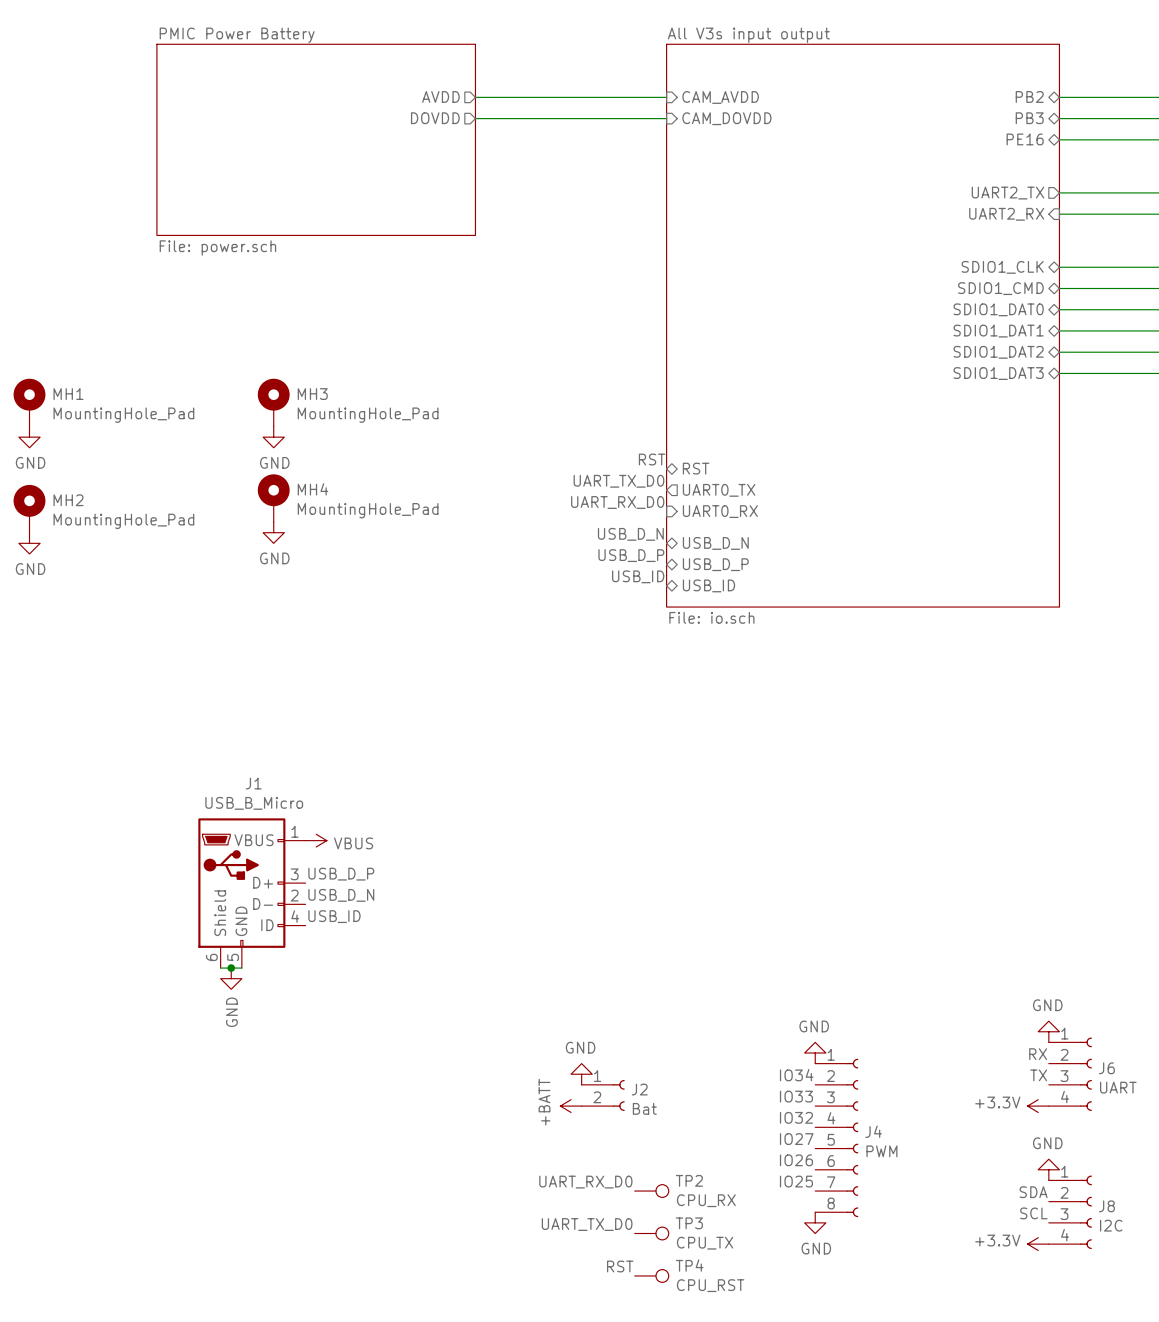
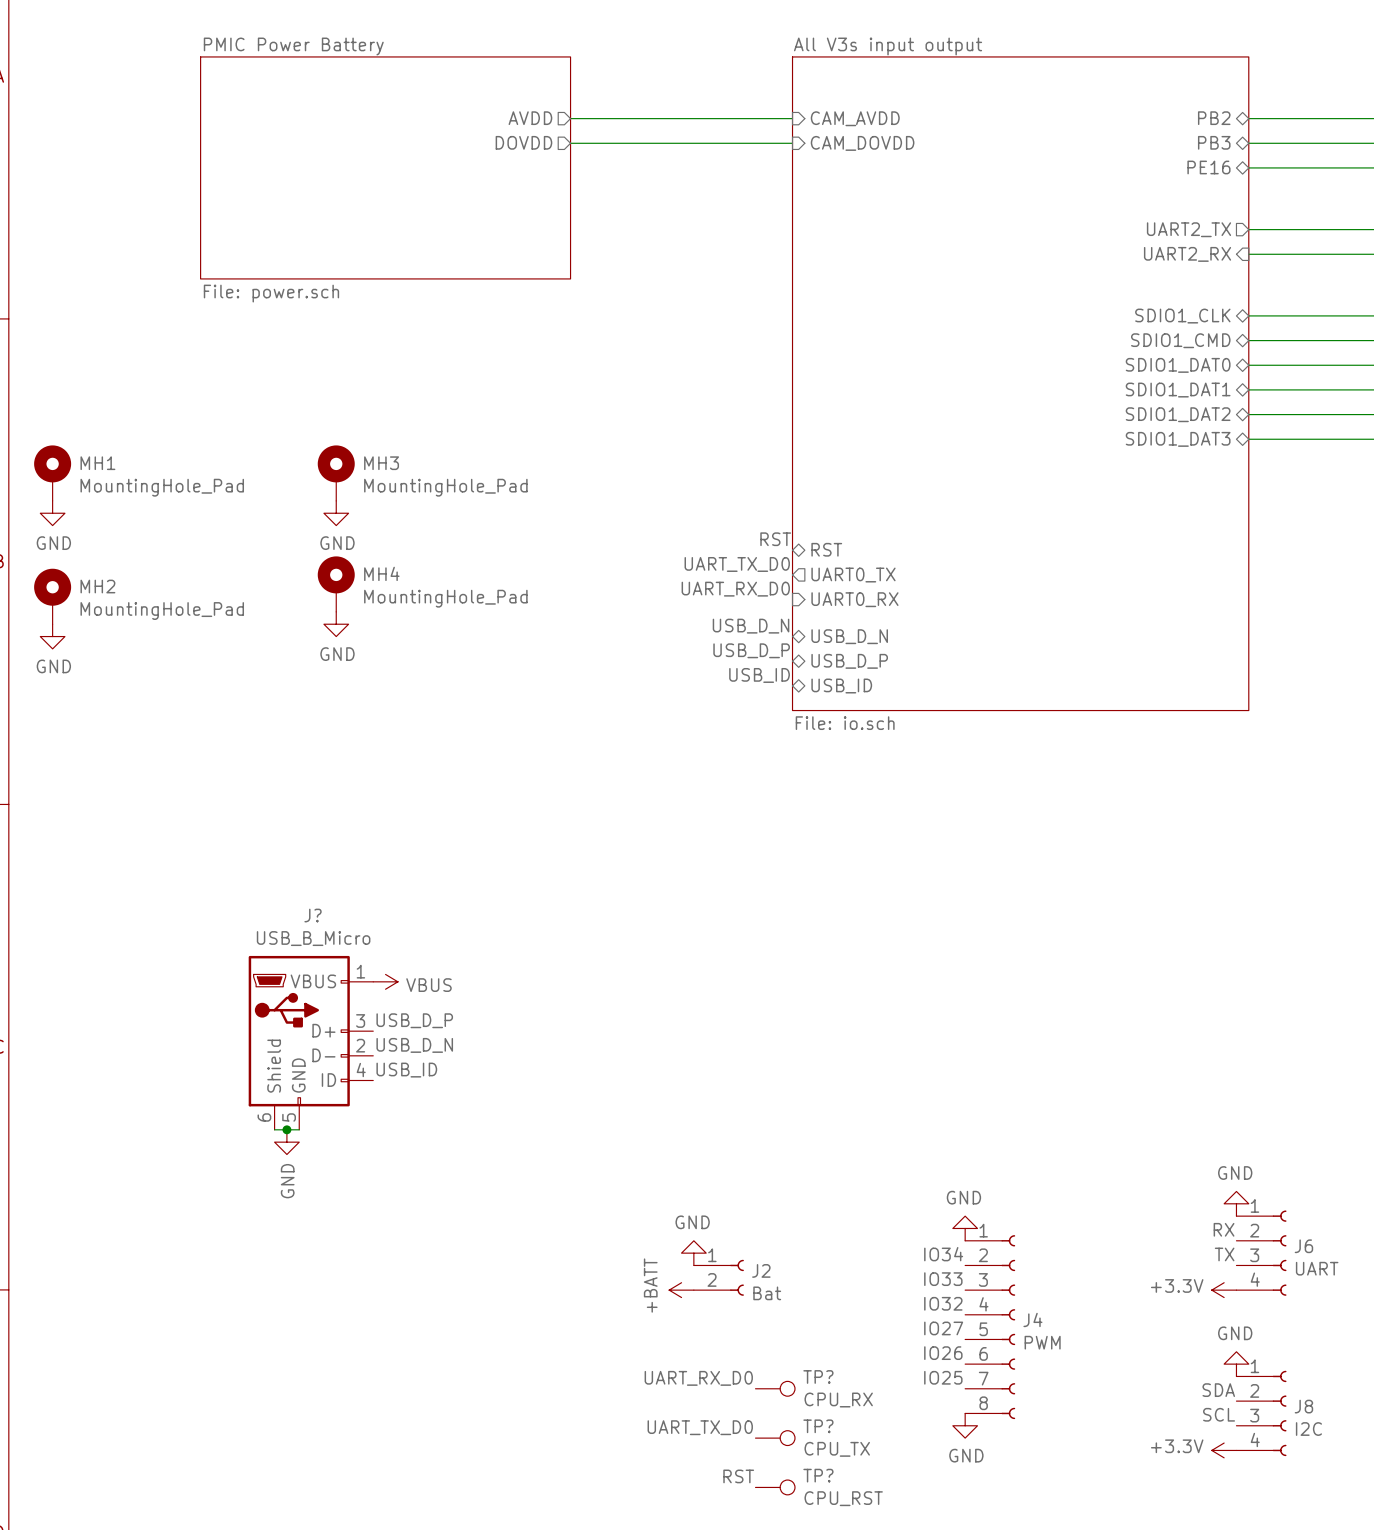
J1 name: J1 (253, 783) -> J? (313, 915)
TP2 name: TP2 (689, 1180) -> TP? (818, 1376)
TP3 name: TP3 (689, 1223) -> TP? (818, 1426)
TP4 name: TP4 (689, 1265) -> TP? (818, 1475)

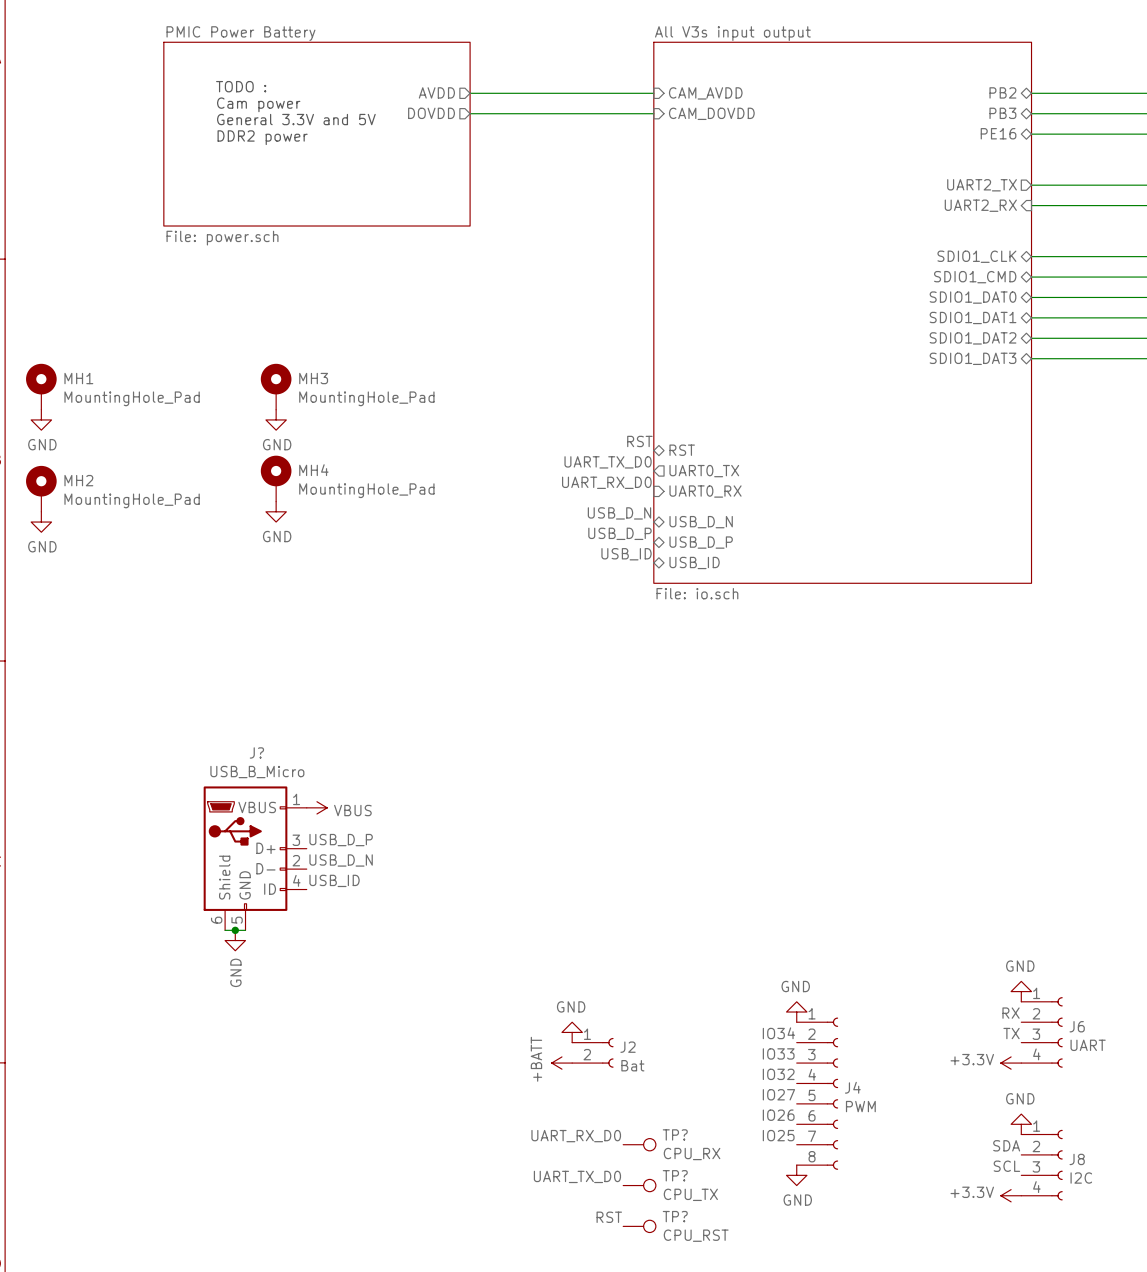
text: none -> TODO : (241, 86)
text: none -> Cam power (258, 104)
text: none -> General 3.3V and 5V (296, 119)
text: none -> DDR2 power (262, 137)

